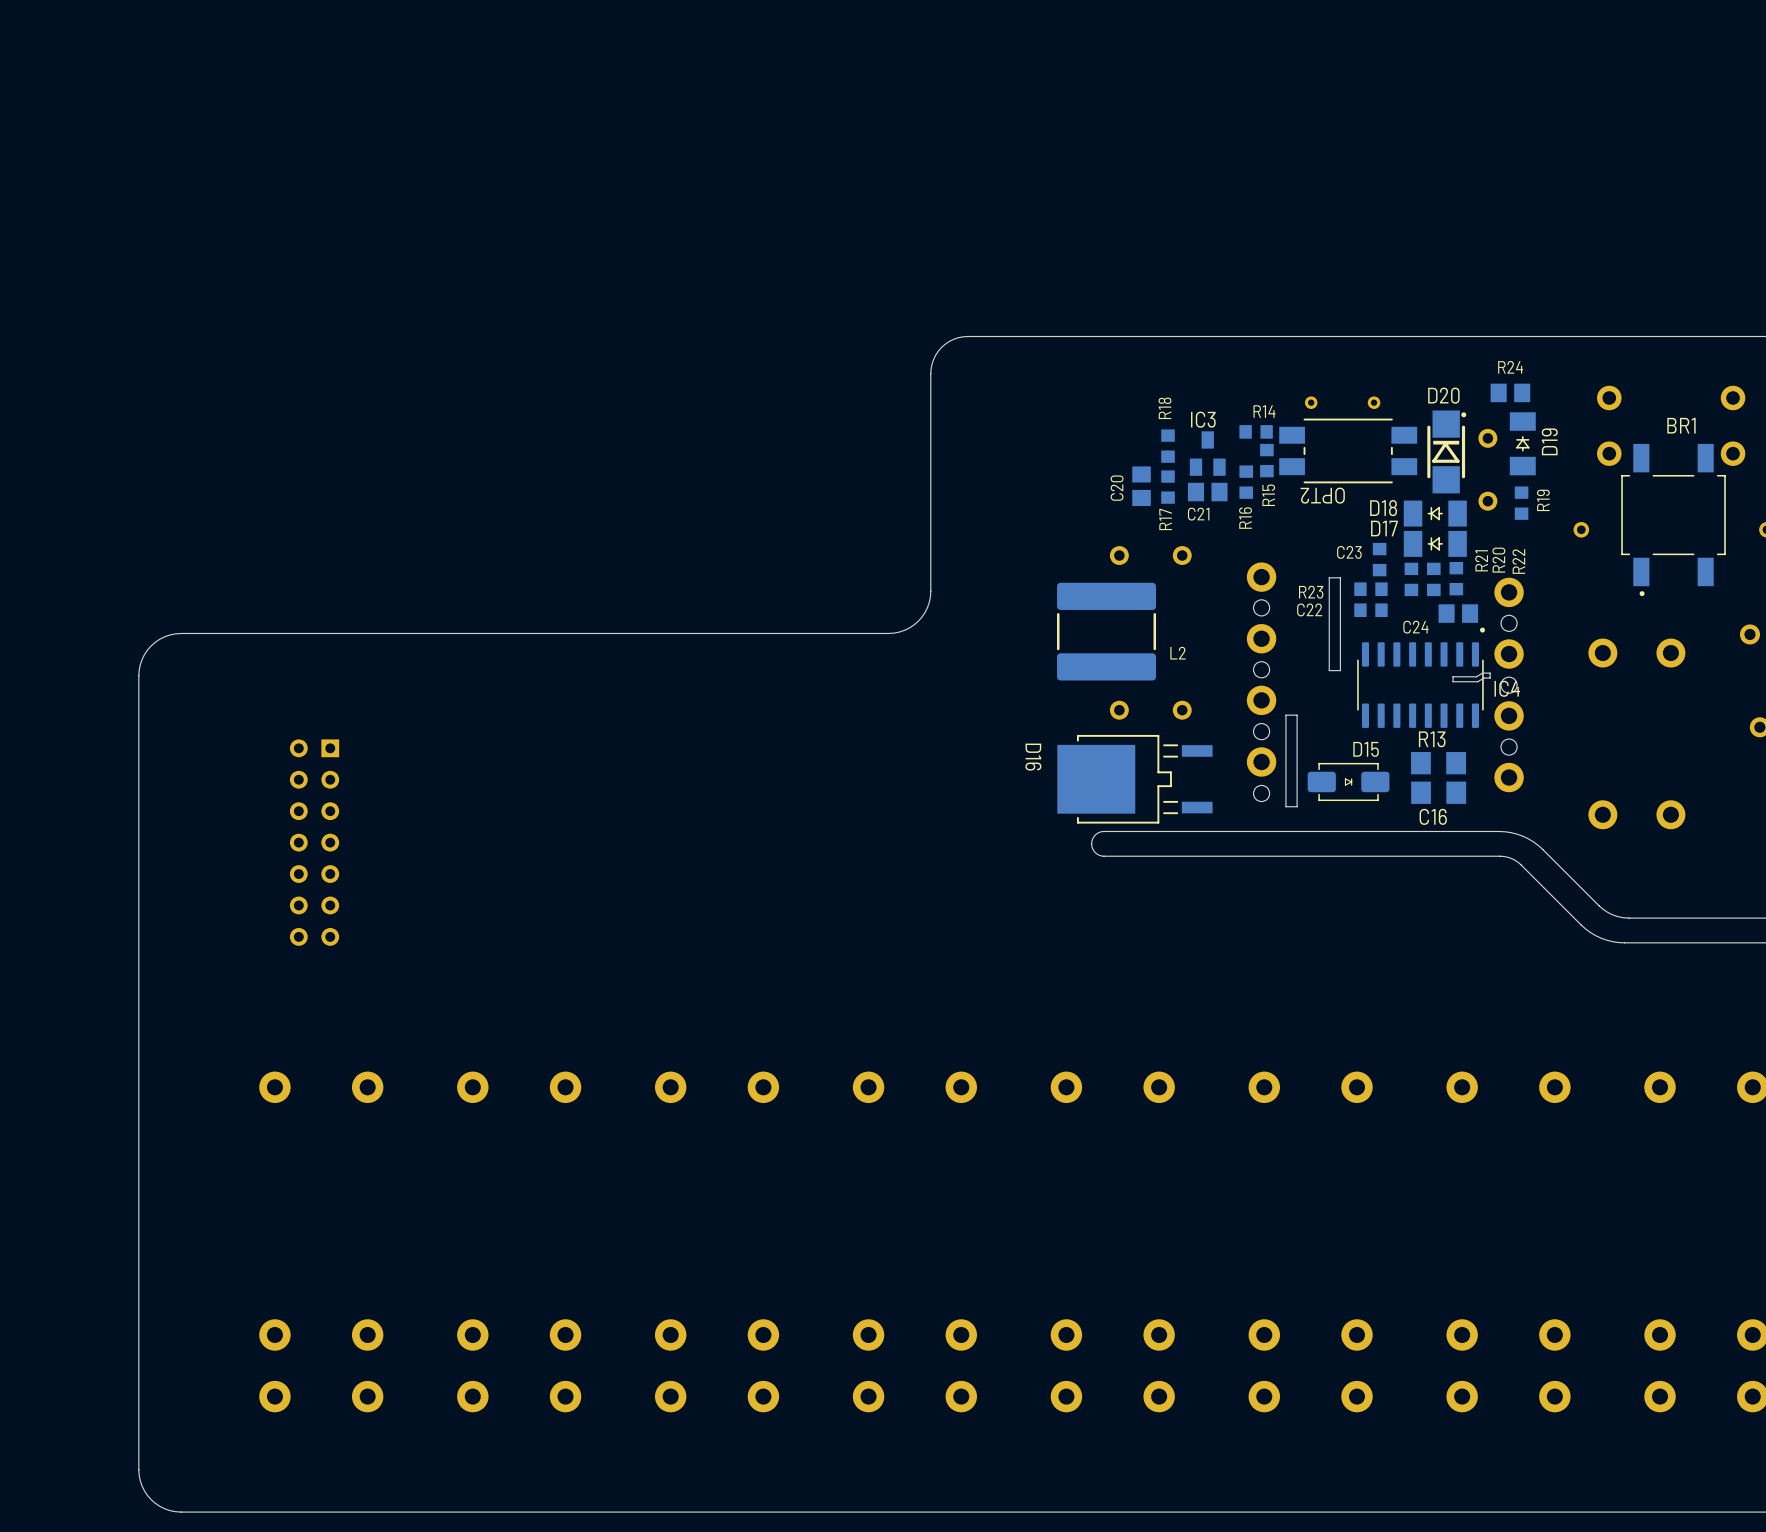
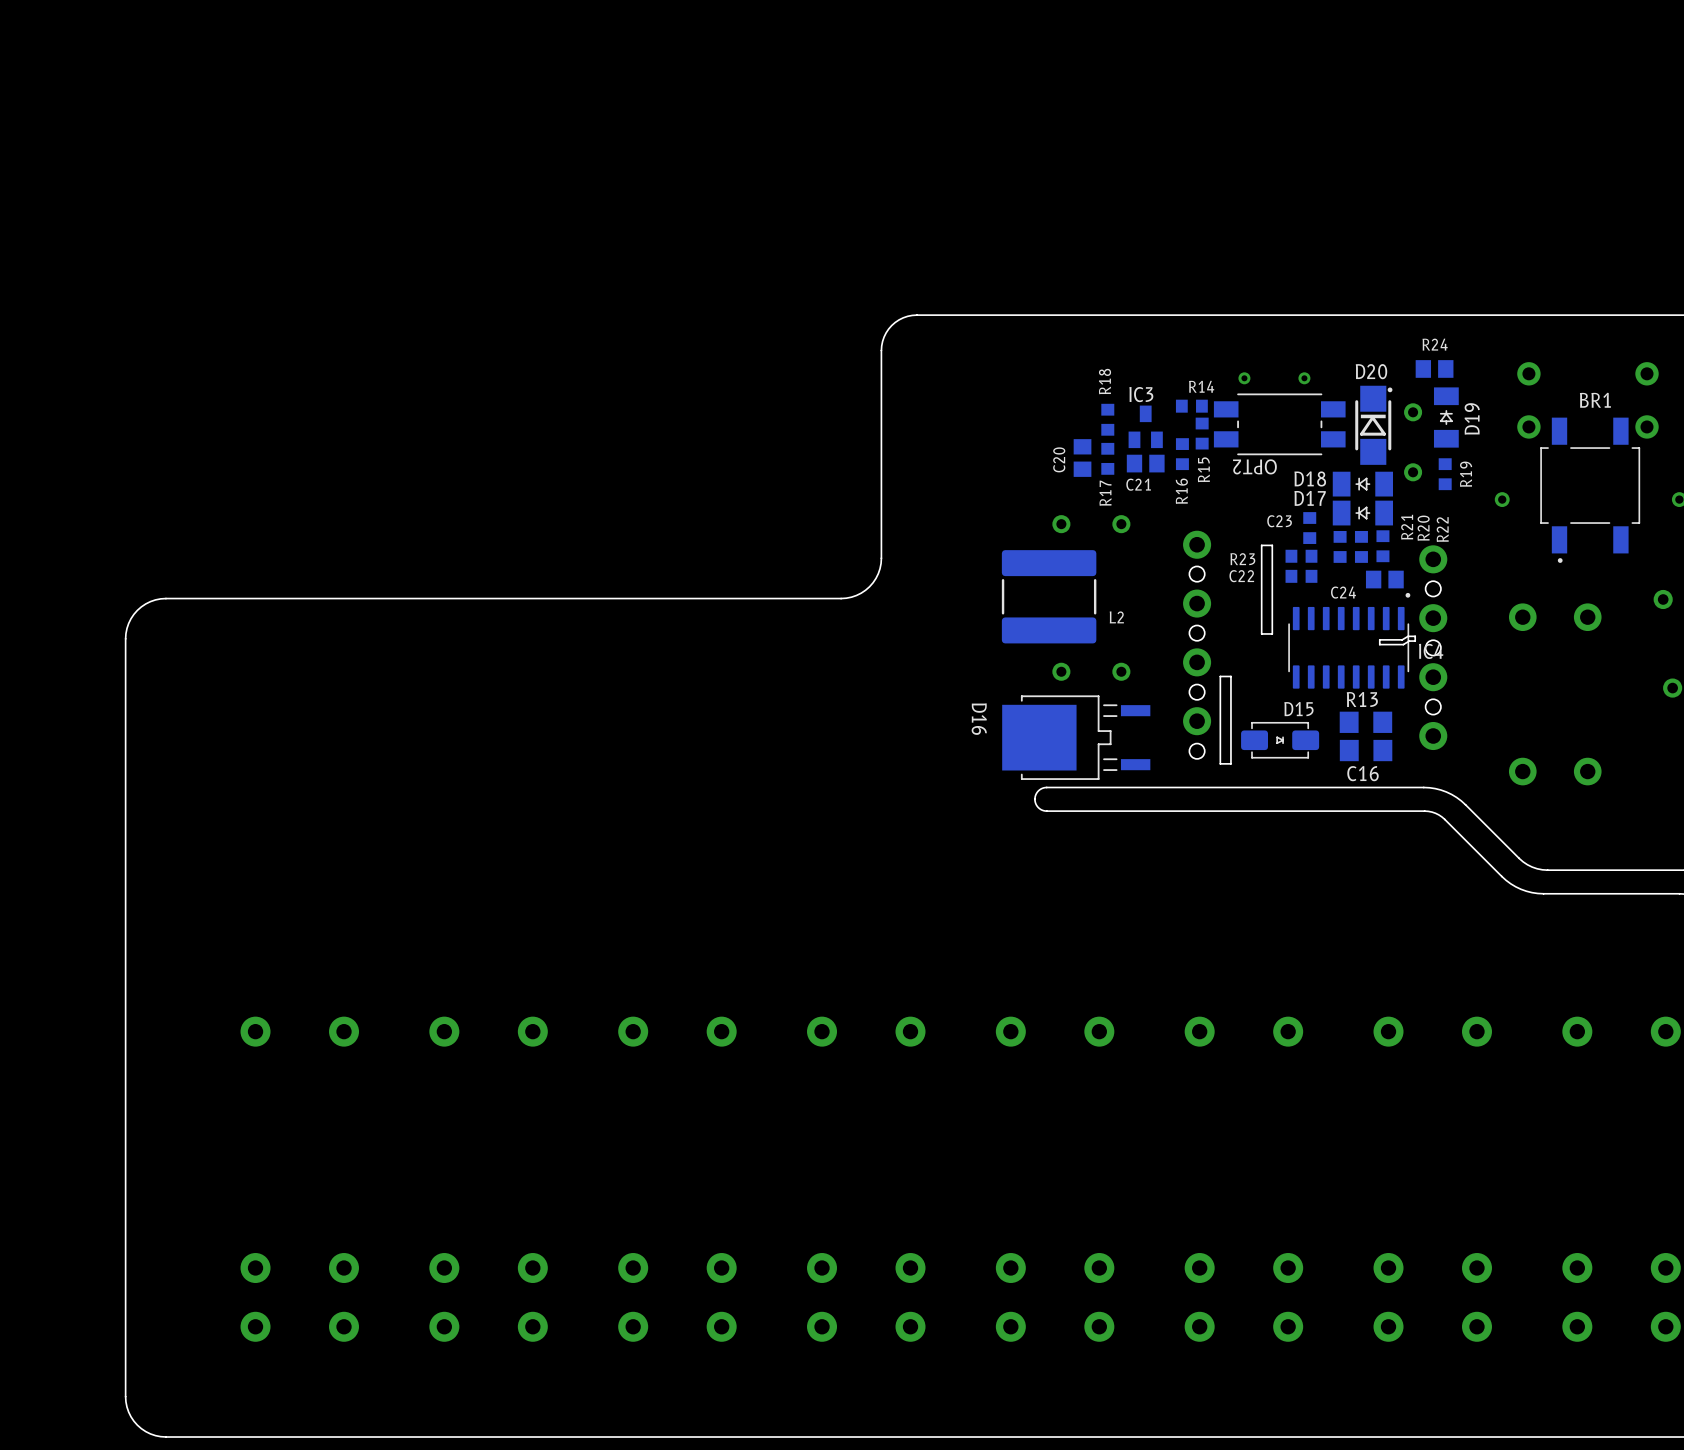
part: (314, 842) -> none

